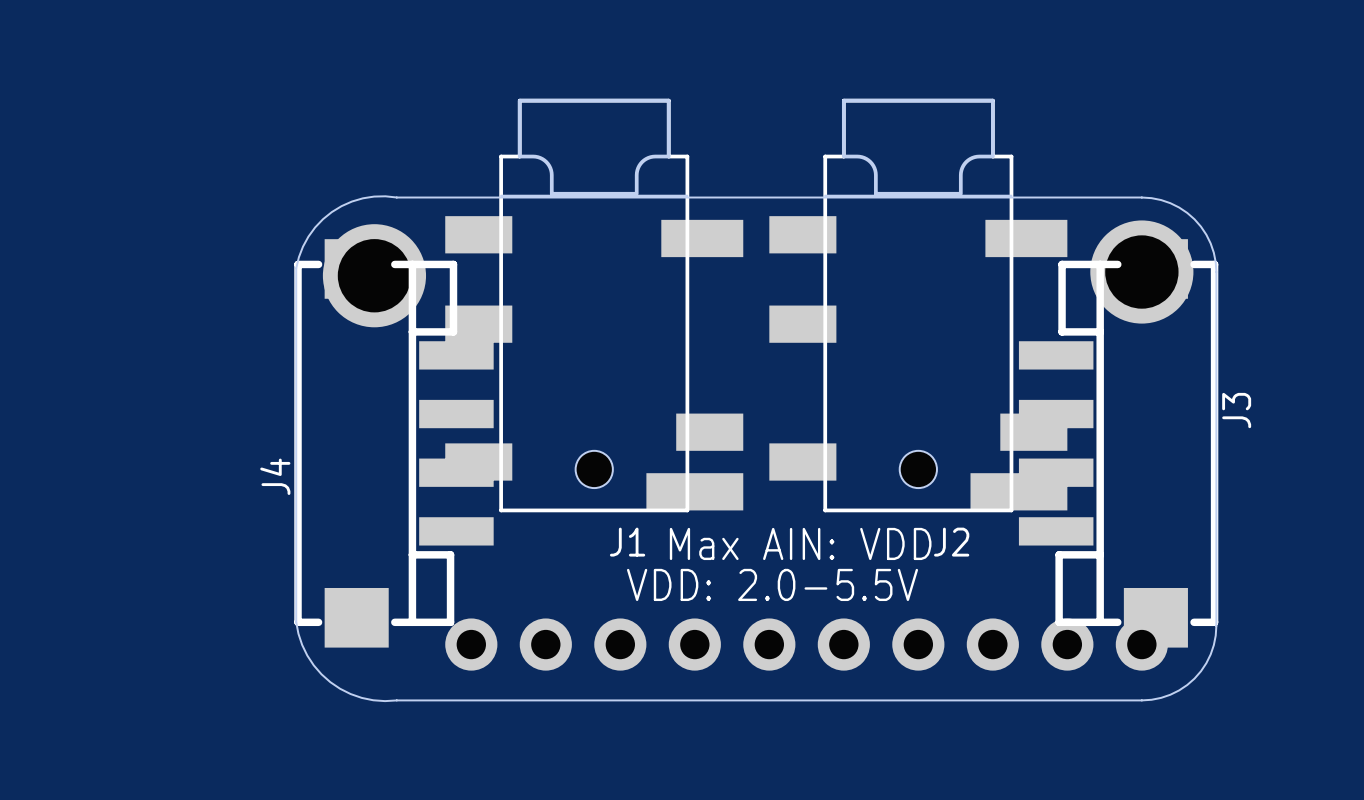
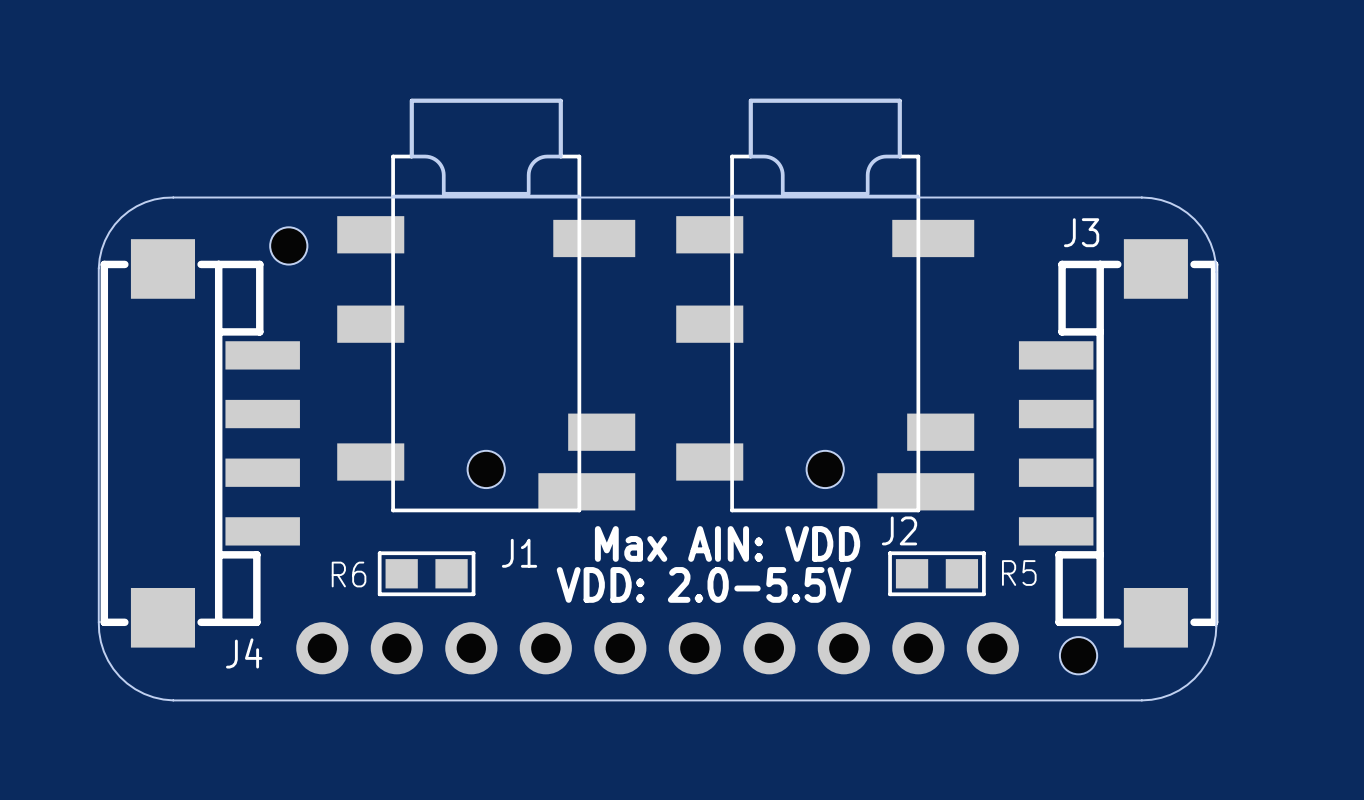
board edge: (396, 197) (362, 198) (331, 212) (308, 236) (296, 268) (296, 622) (298, 633) (307, 655) (321, 674) (330, 682) (340, 688) (361, 697) (373, 700) (396, 700) -> (396, 197) (173, 197) (154, 199) (136, 206) (114, 224) (101, 249) (98, 268) (98, 622) (100, 642) (113, 669) (135, 689) (163, 699) (396, 700)
hole: none -> (288, 245)
part: (1141, 272) -> none
part: (374, 275) -> none
J1 position: (594, 305) -> (486, 305)
J2 position: (918, 305) -> (825, 305)
J3 name rotation: 0° (1236, 410) -> 90° clockwise (1081, 232)
J3 name position: J3 (1236, 410) -> J3 (1081, 232)
J4 position: (393, 443) -> (200, 443)
J4 name rotation: 0° (275, 476) -> 90° clockwise (244, 653)
J4 name position: J4 (275, 476) -> J4 (244, 653)
J1 name position: J1 (627, 542) -> J1 (519, 553)
J2 name position: J2 (951, 542) -> J2 (899, 530)
text position: Max AIN: VDD (800, 543) -> Max AIN: VDD (727, 543)
R6: none -> (426, 573)
R5: none -> (936, 573)
text position: VDD: 2.0-5.5V (772, 584) -> VDD: 2.0-5.5V (704, 584)
part position: (806, 644) -> (657, 648)
hole: none -> (1078, 655)

